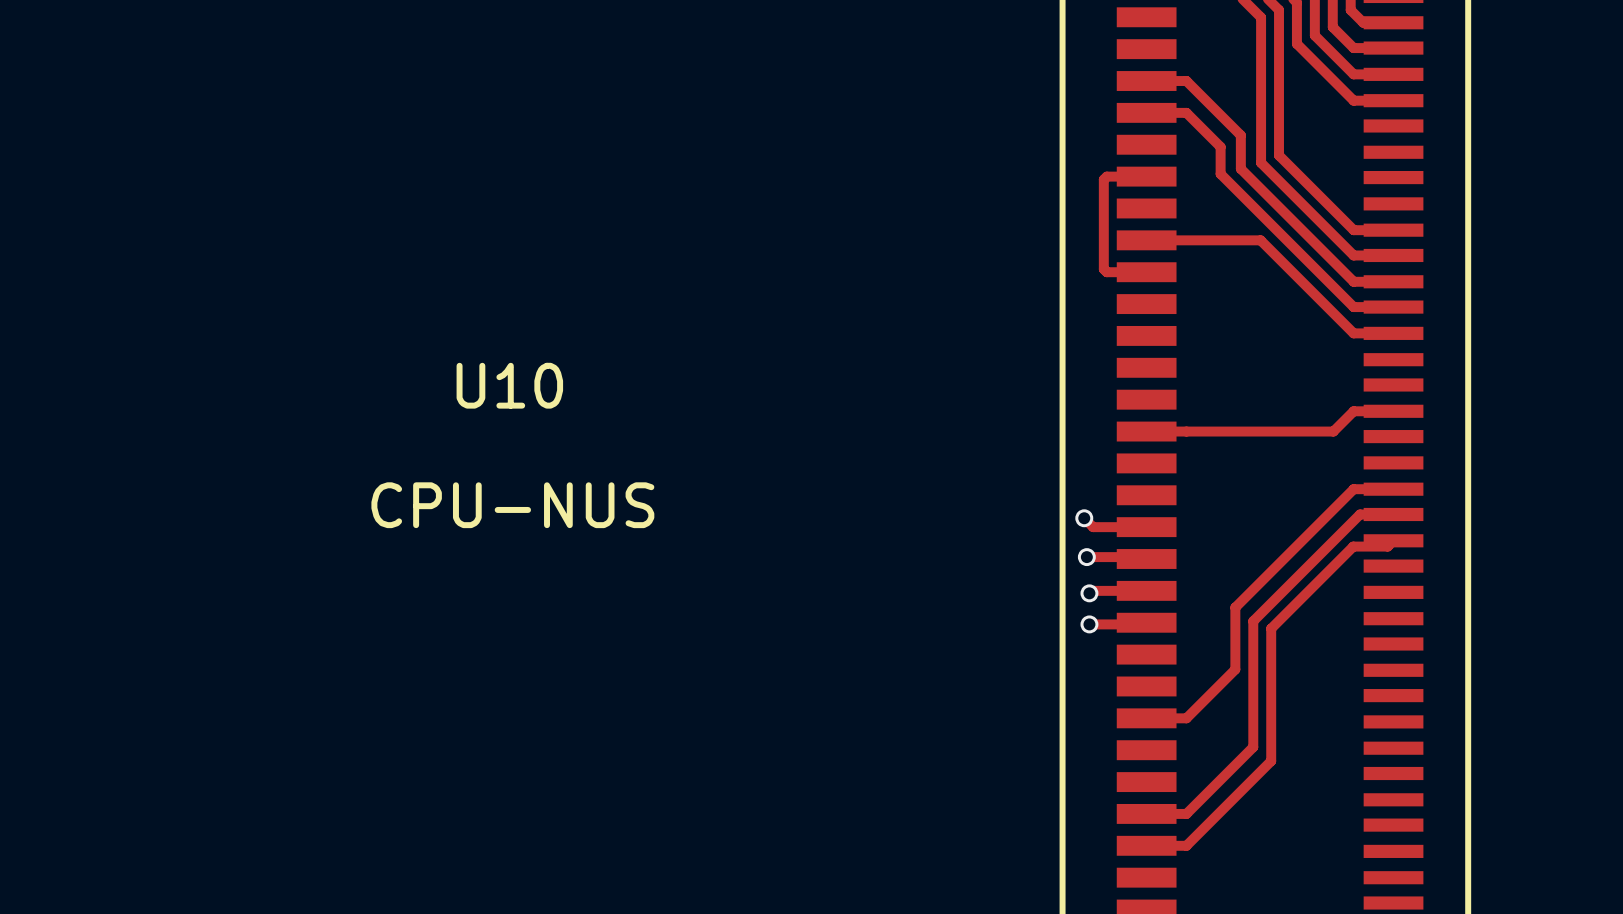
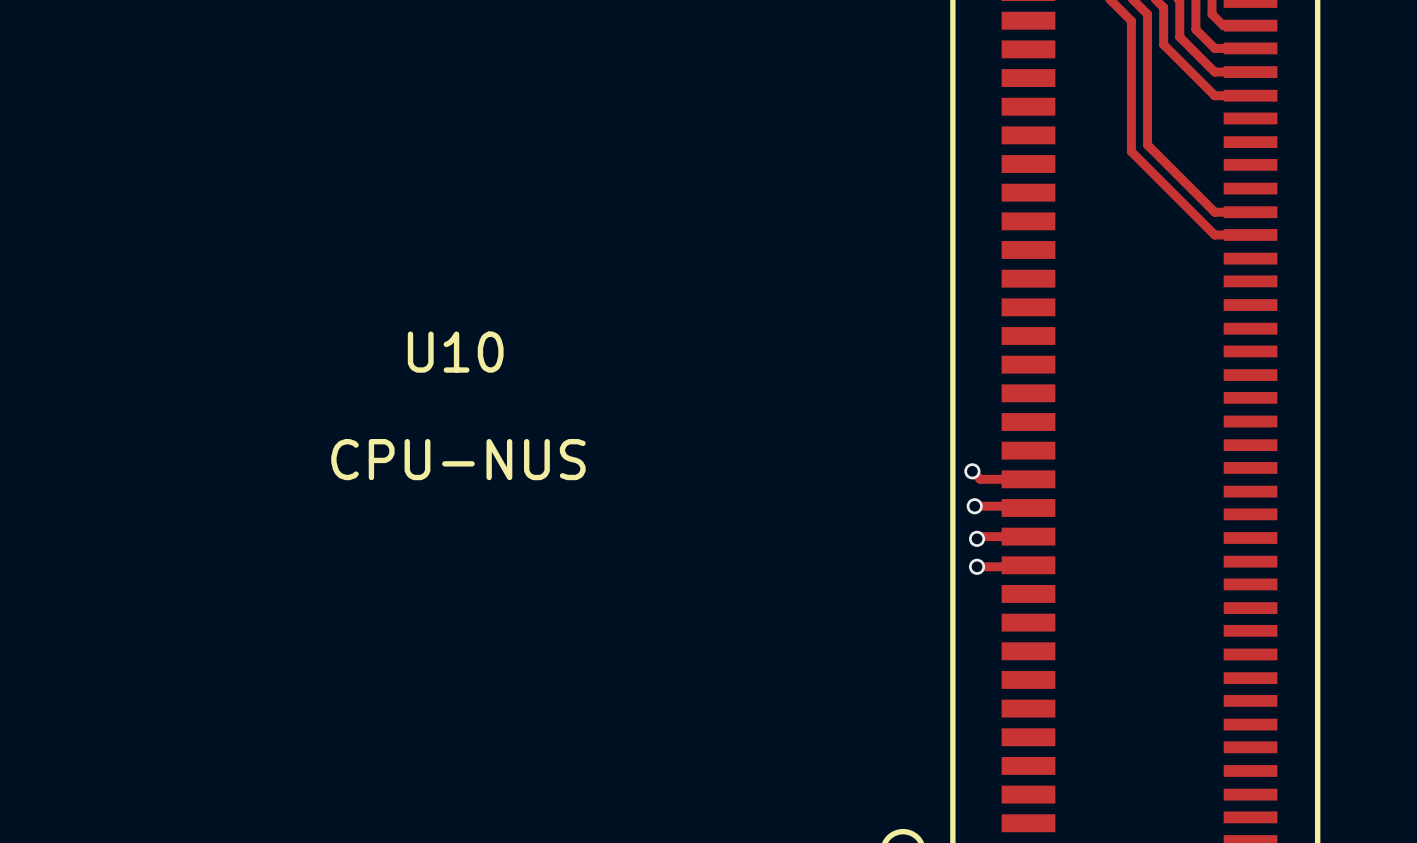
track: (1146, 81) (1186, 81) (1240, 135) (1240, 168) (1353, 281) (1393, 281) -> none
track: (1146, 112) (1186, 112) (1220, 147) (1220, 174) (1353, 307) (1393, 307) -> none
track: (1146, 176) (1106, 176) (1103, 179) (1103, 269) (1106, 272) (1146, 272) -> none
track: (1146, 240) (1260, 240) (1353, 333) (1393, 333) -> none
track: (1393, 411) (1353, 411) (1333, 431) (1146, 431) -> none
track: (1393, 489) (1353, 489) (1235, 607) (1235, 669) (1186, 718) (1146, 718) -> none
track: (1393, 514) (1360, 514) (1253, 621) (1253, 747) (1186, 813) (1146, 813) -> none
track: (1393, 540) (1387, 546) (1353, 546) (1271, 628) (1271, 761) (1186, 845) (1146, 845) -> none

